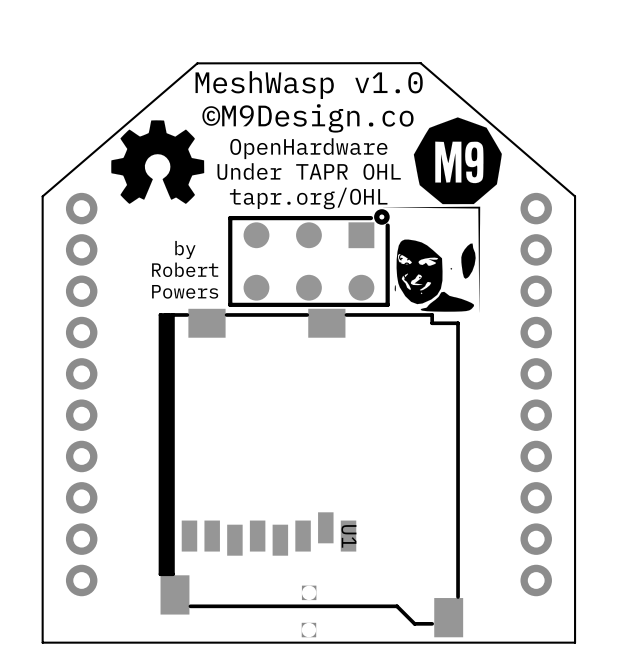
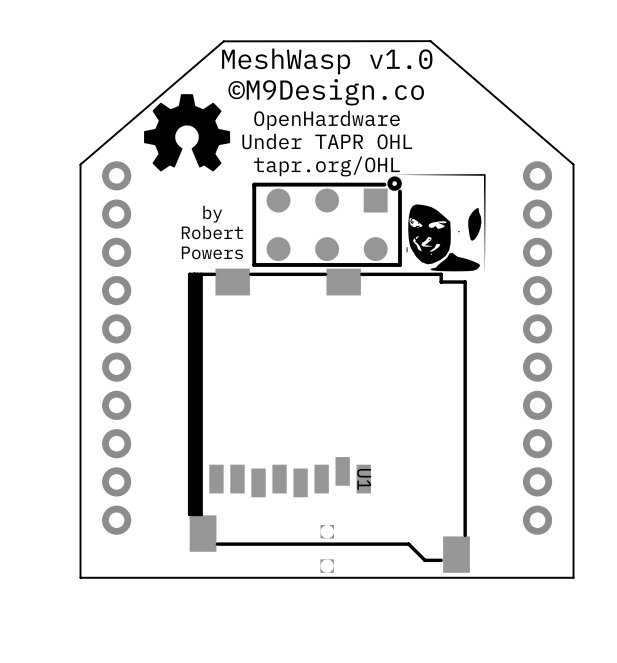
drawing: [413, 117, 502, 205] -> none

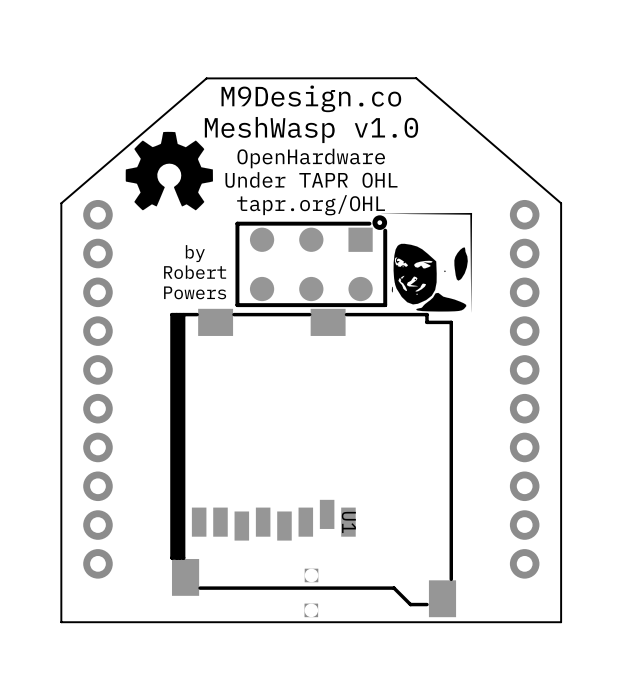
text: MeshWasp v1.0 (327, 61) -> M9Design.co (311, 98)
text: ©M9Design.co (326, 92) -> MeshWasp v1.0 (311, 130)

